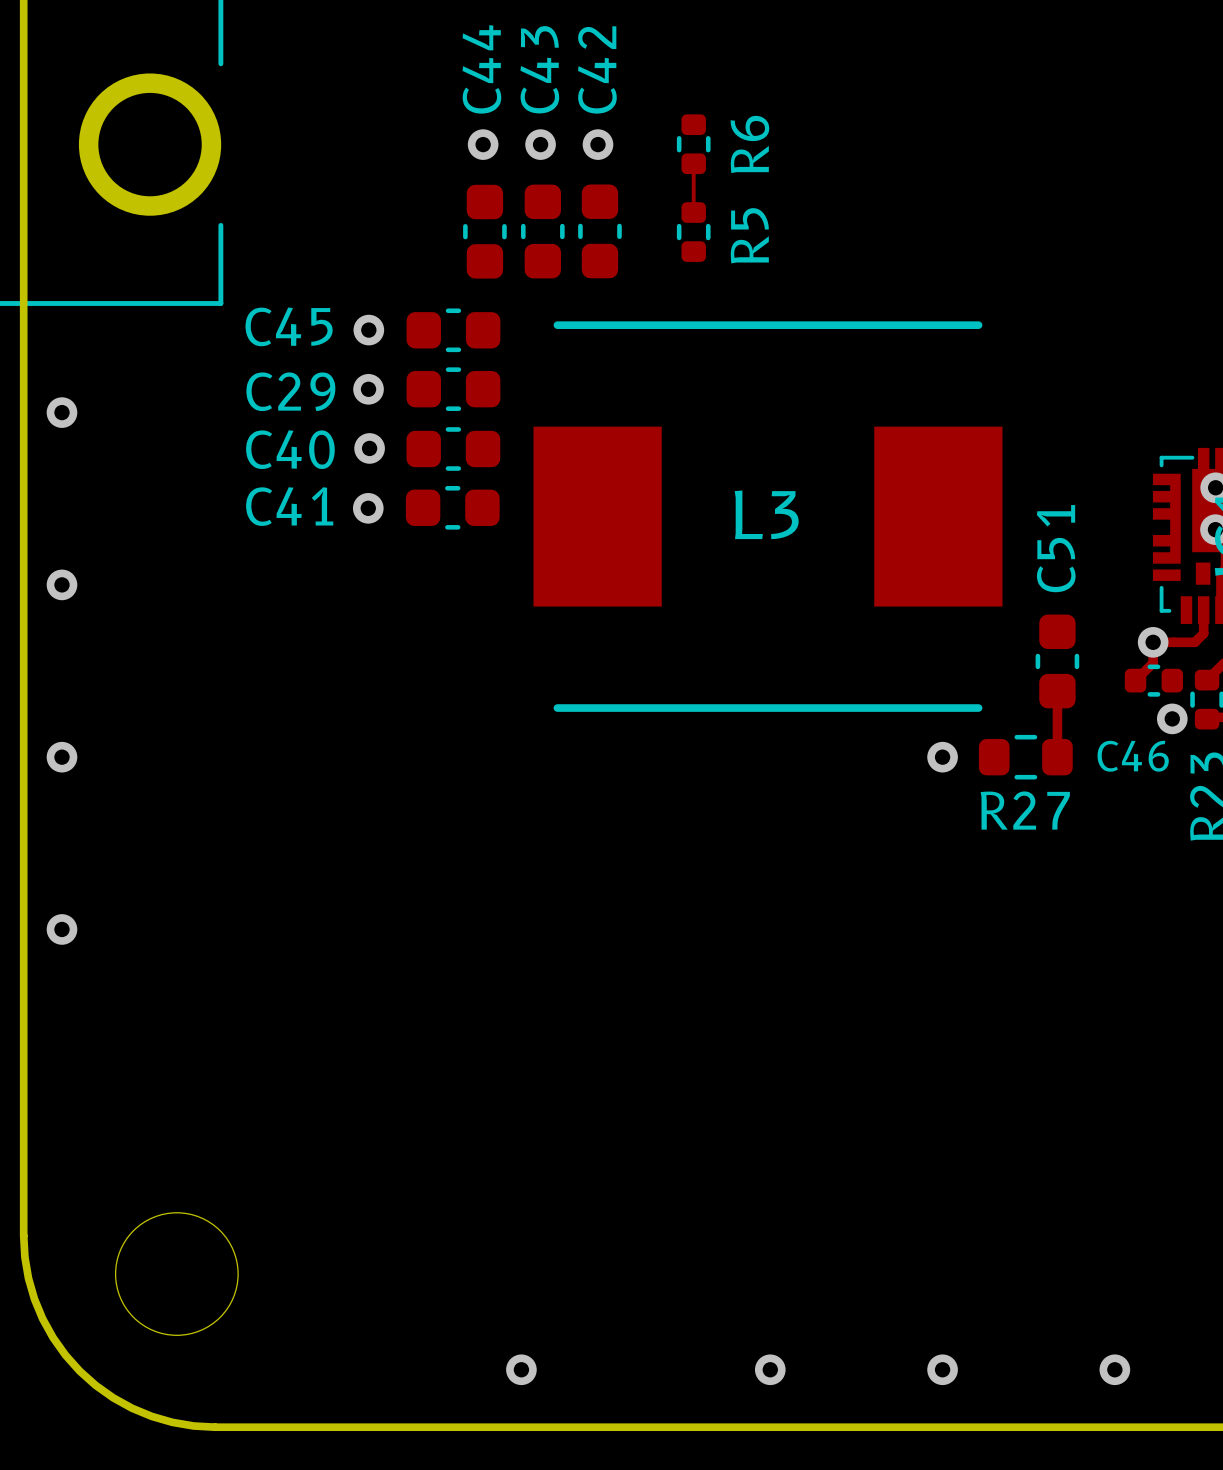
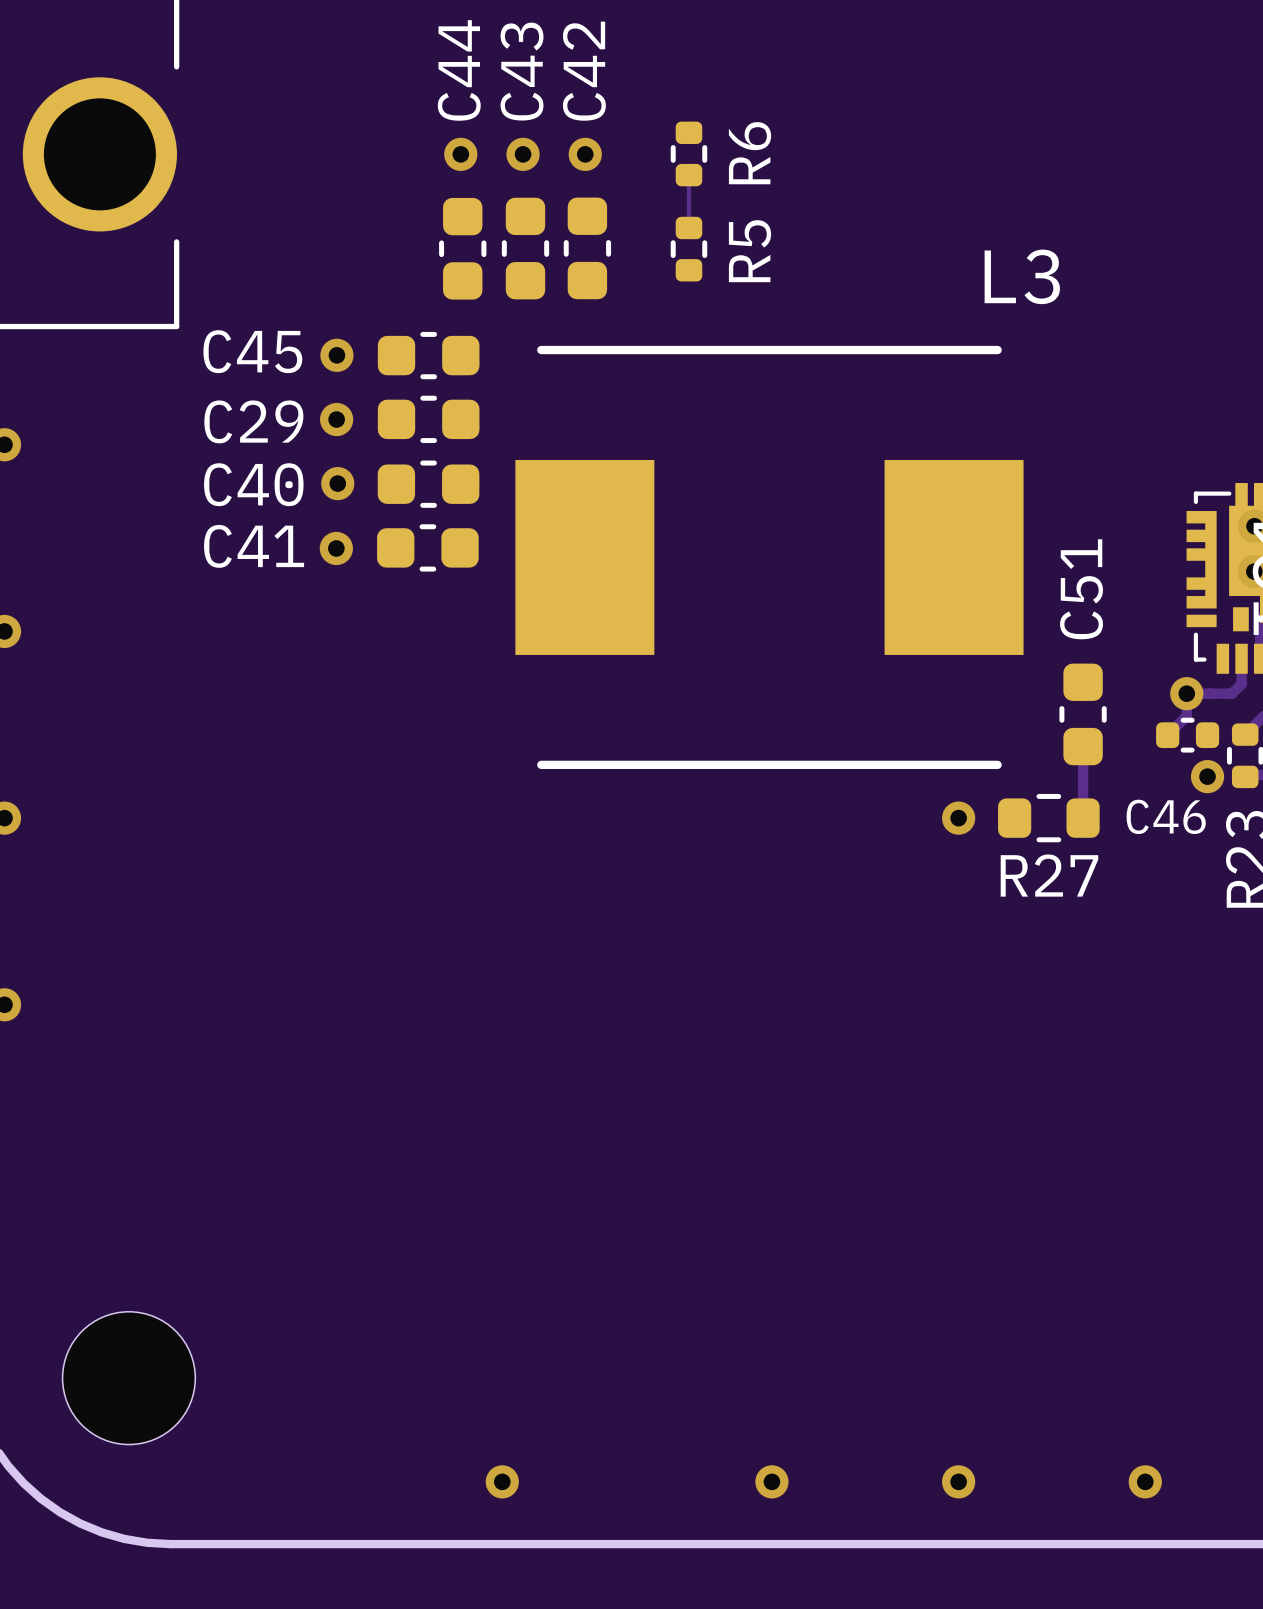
L3 name position: L3 (766, 514) -> L3 (1022, 276)

